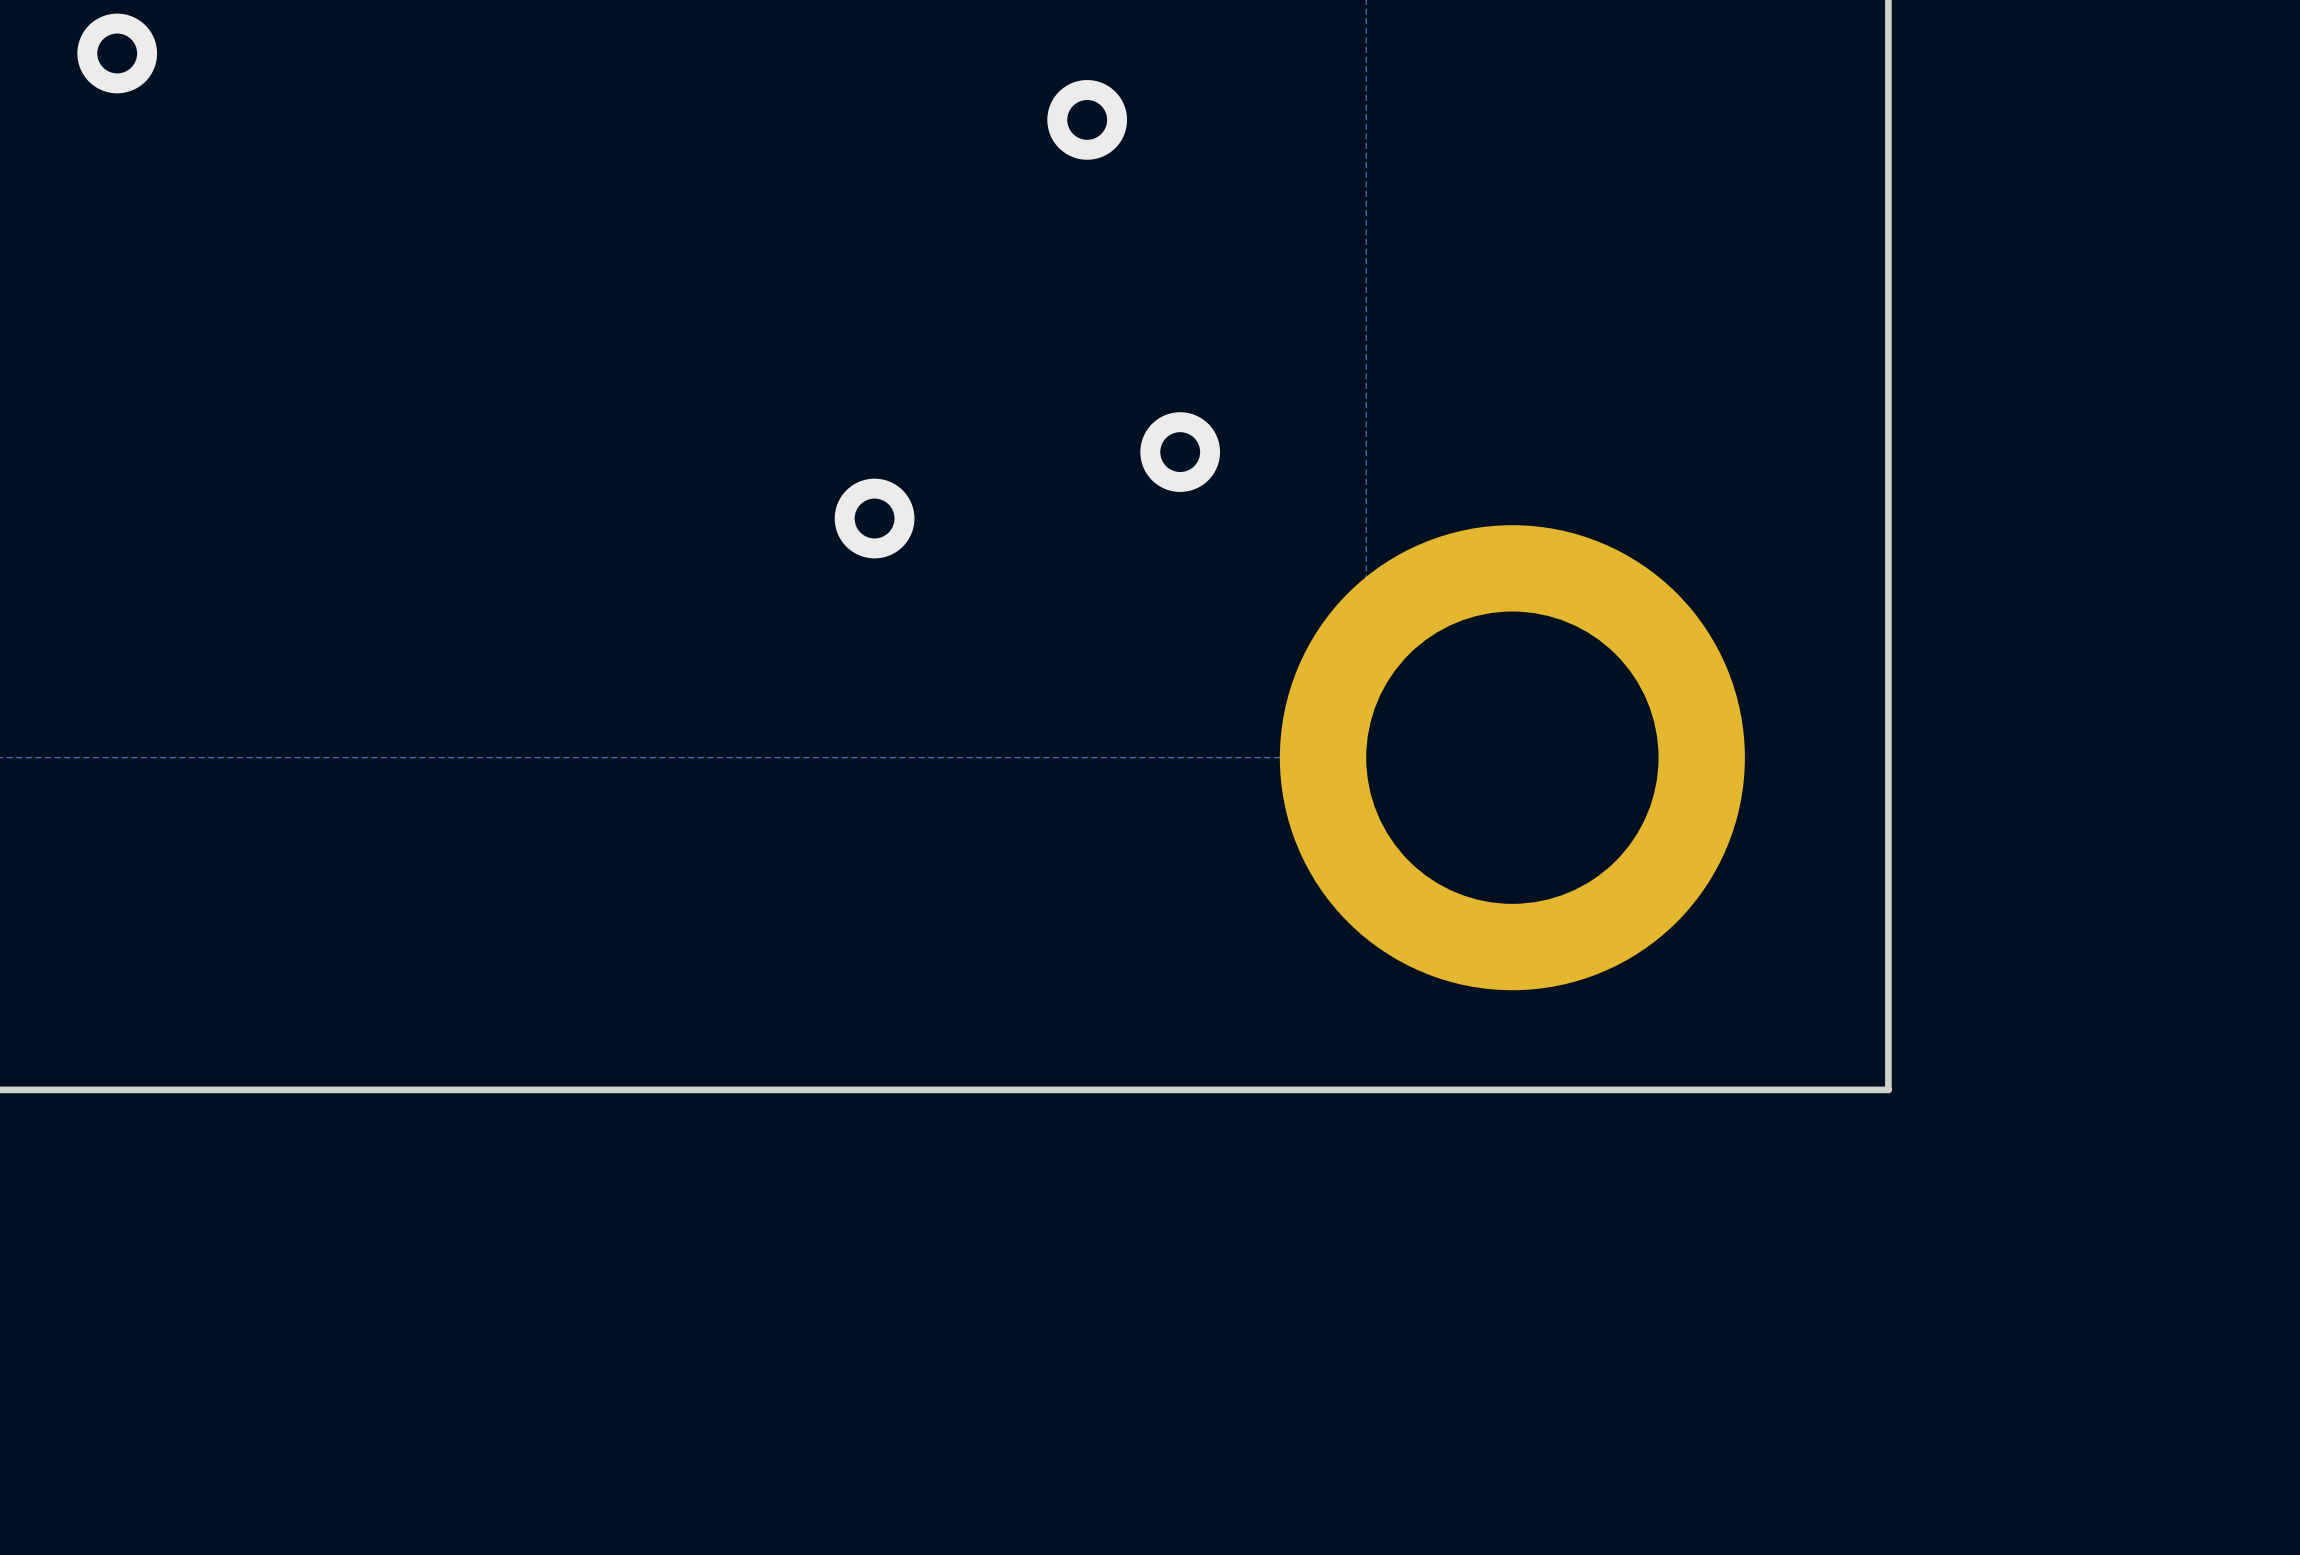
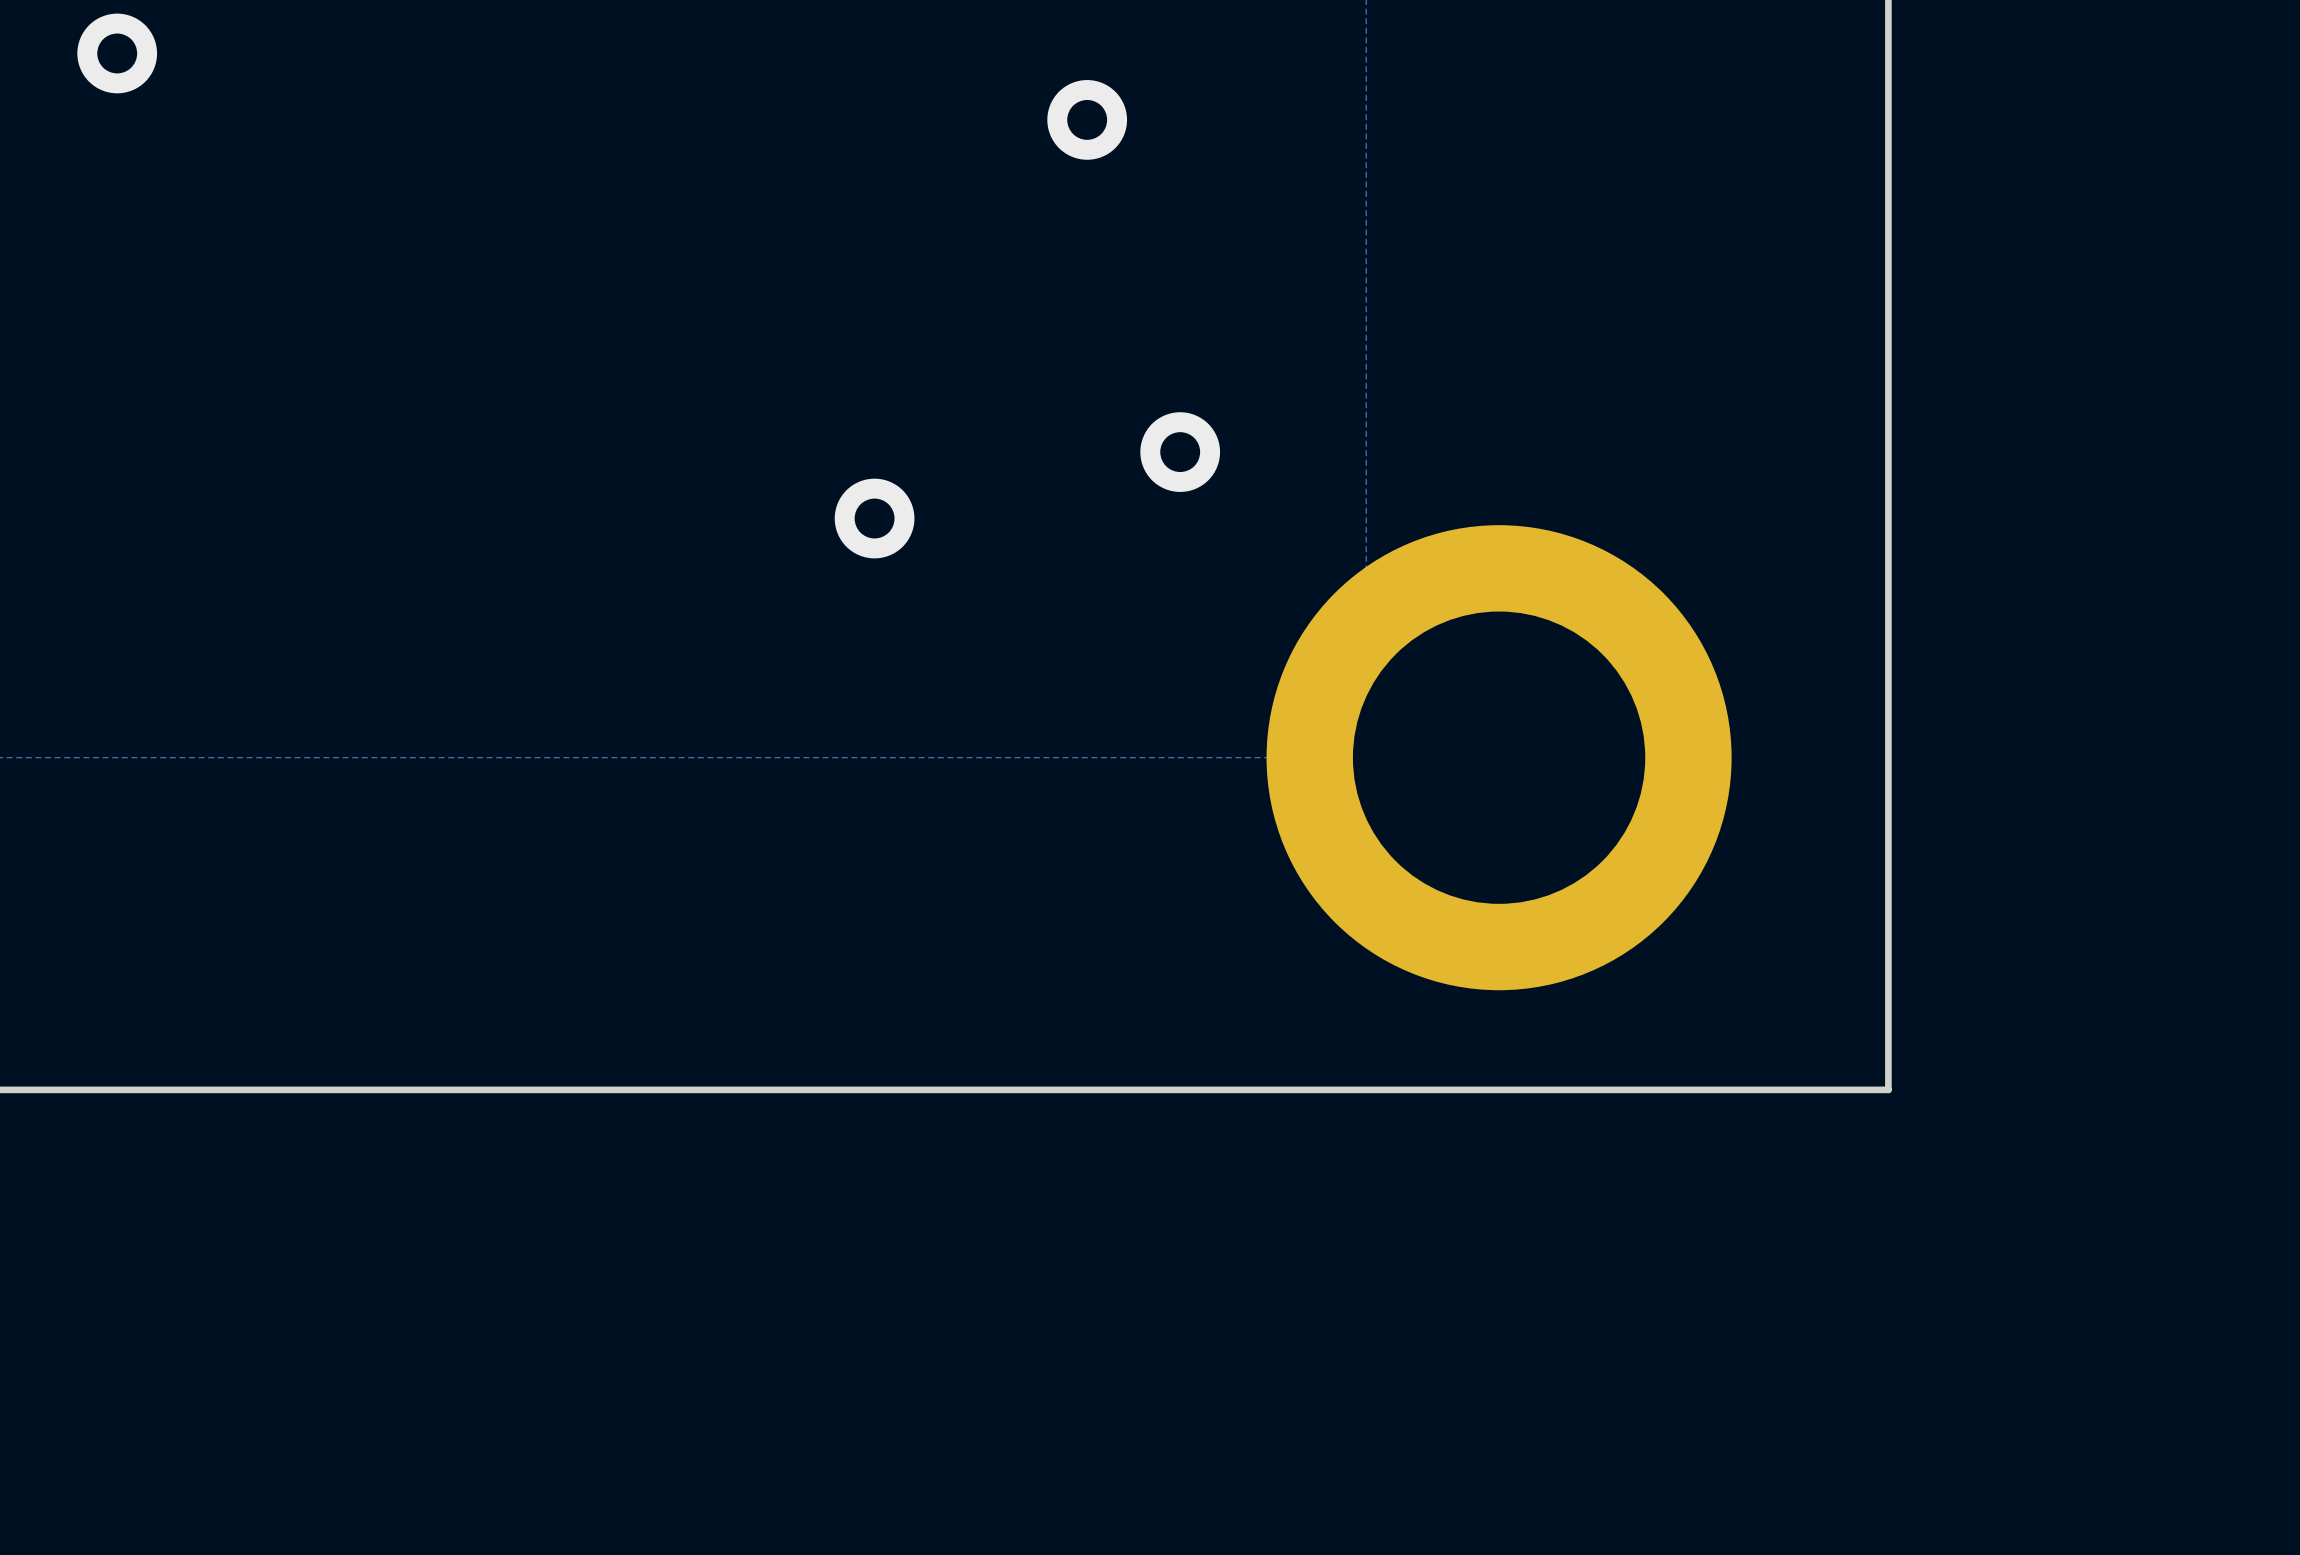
part position: (1512, 757) -> (1499, 757)

